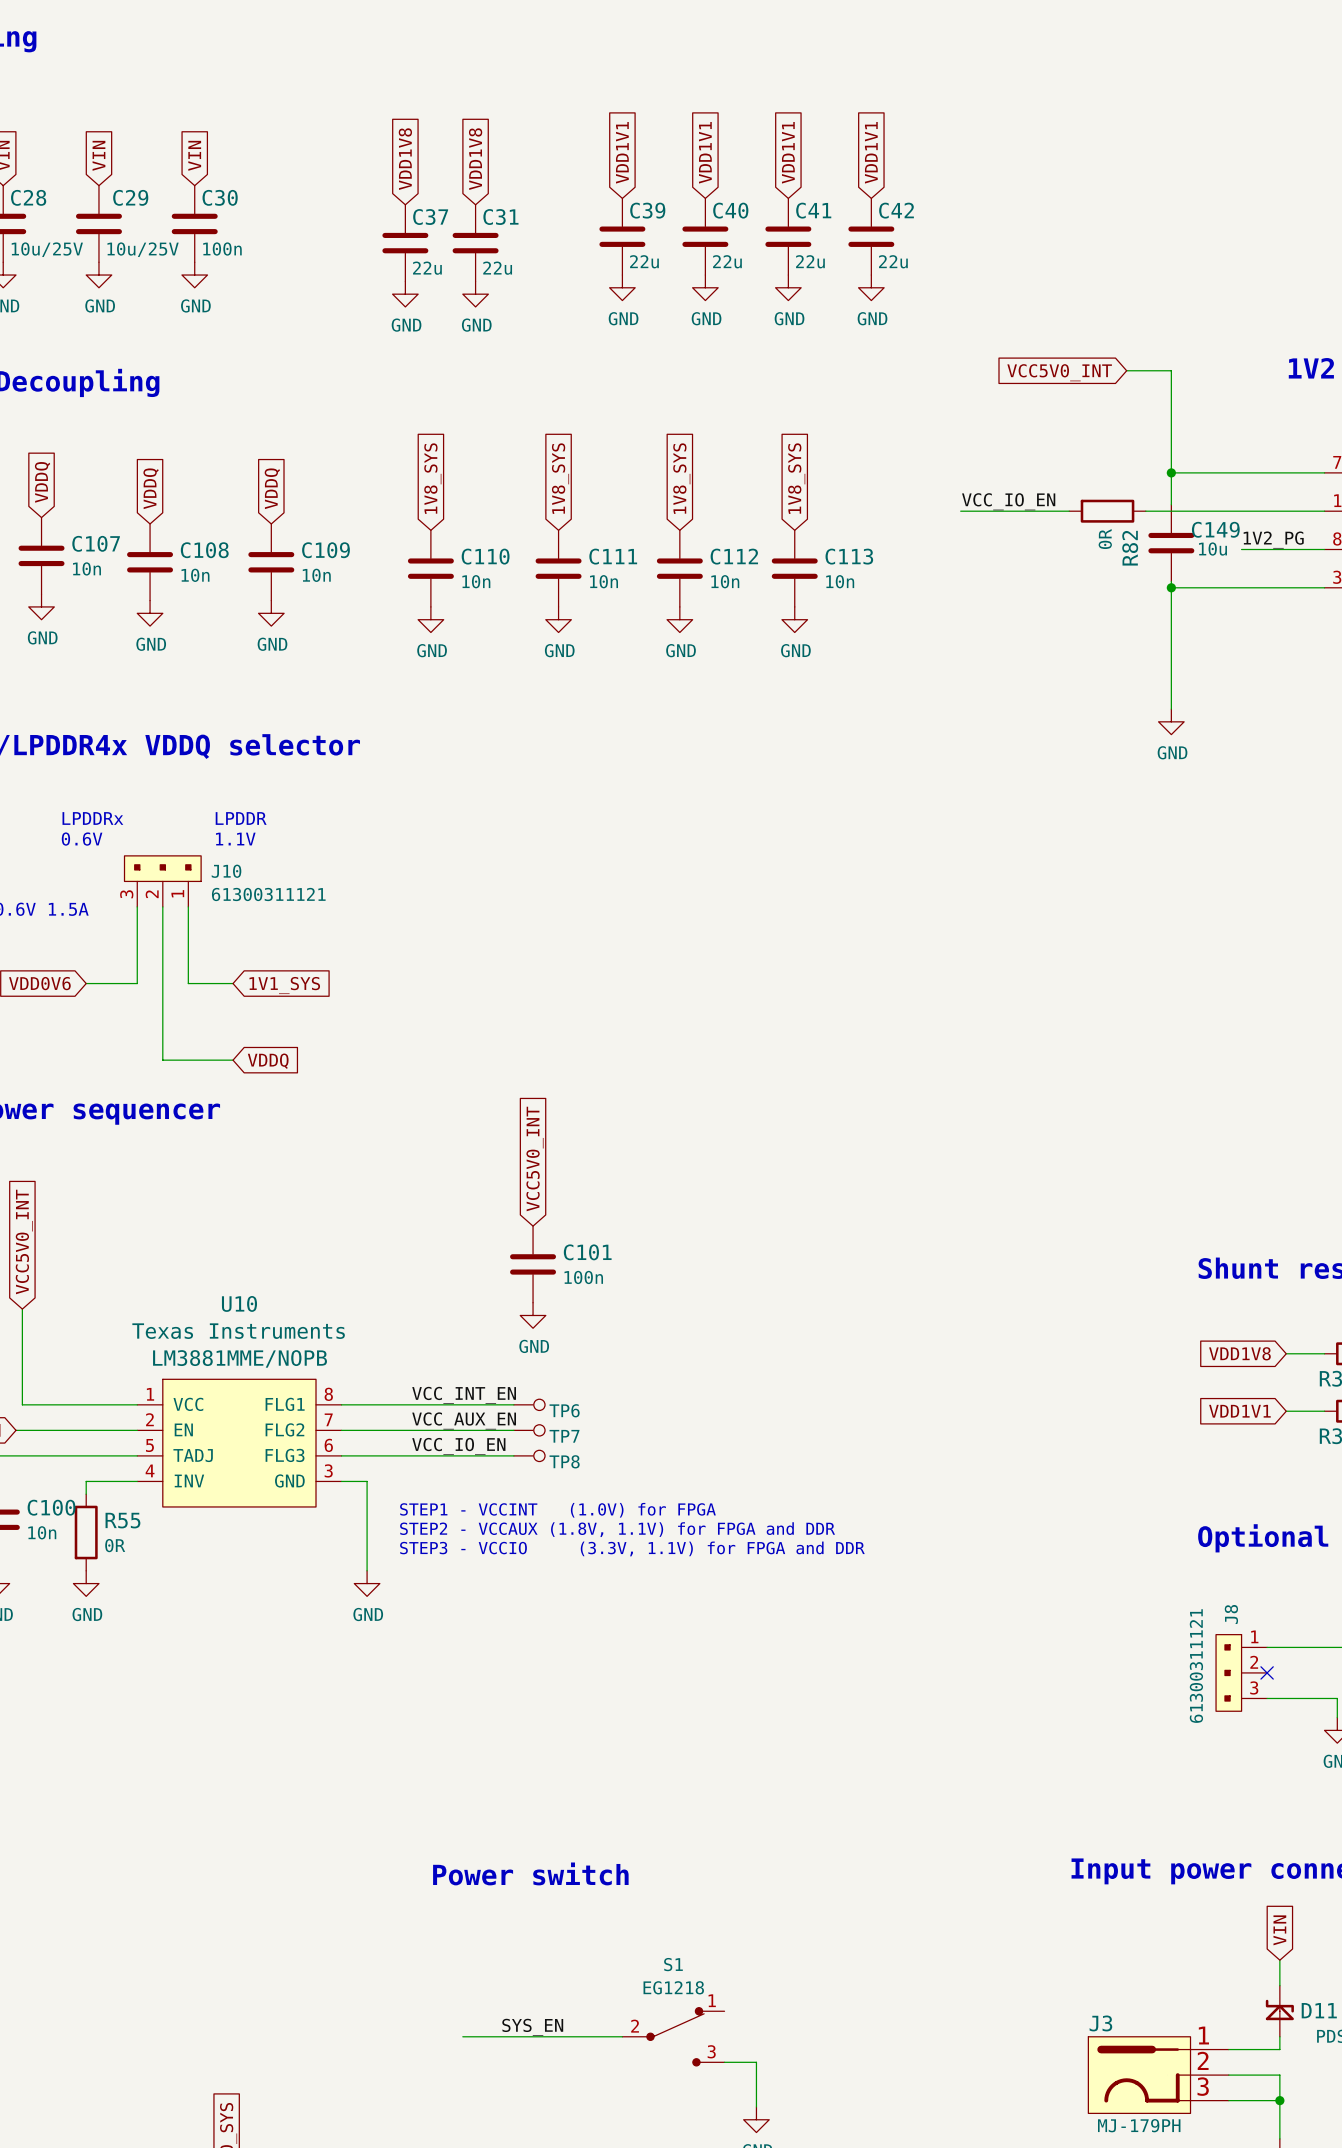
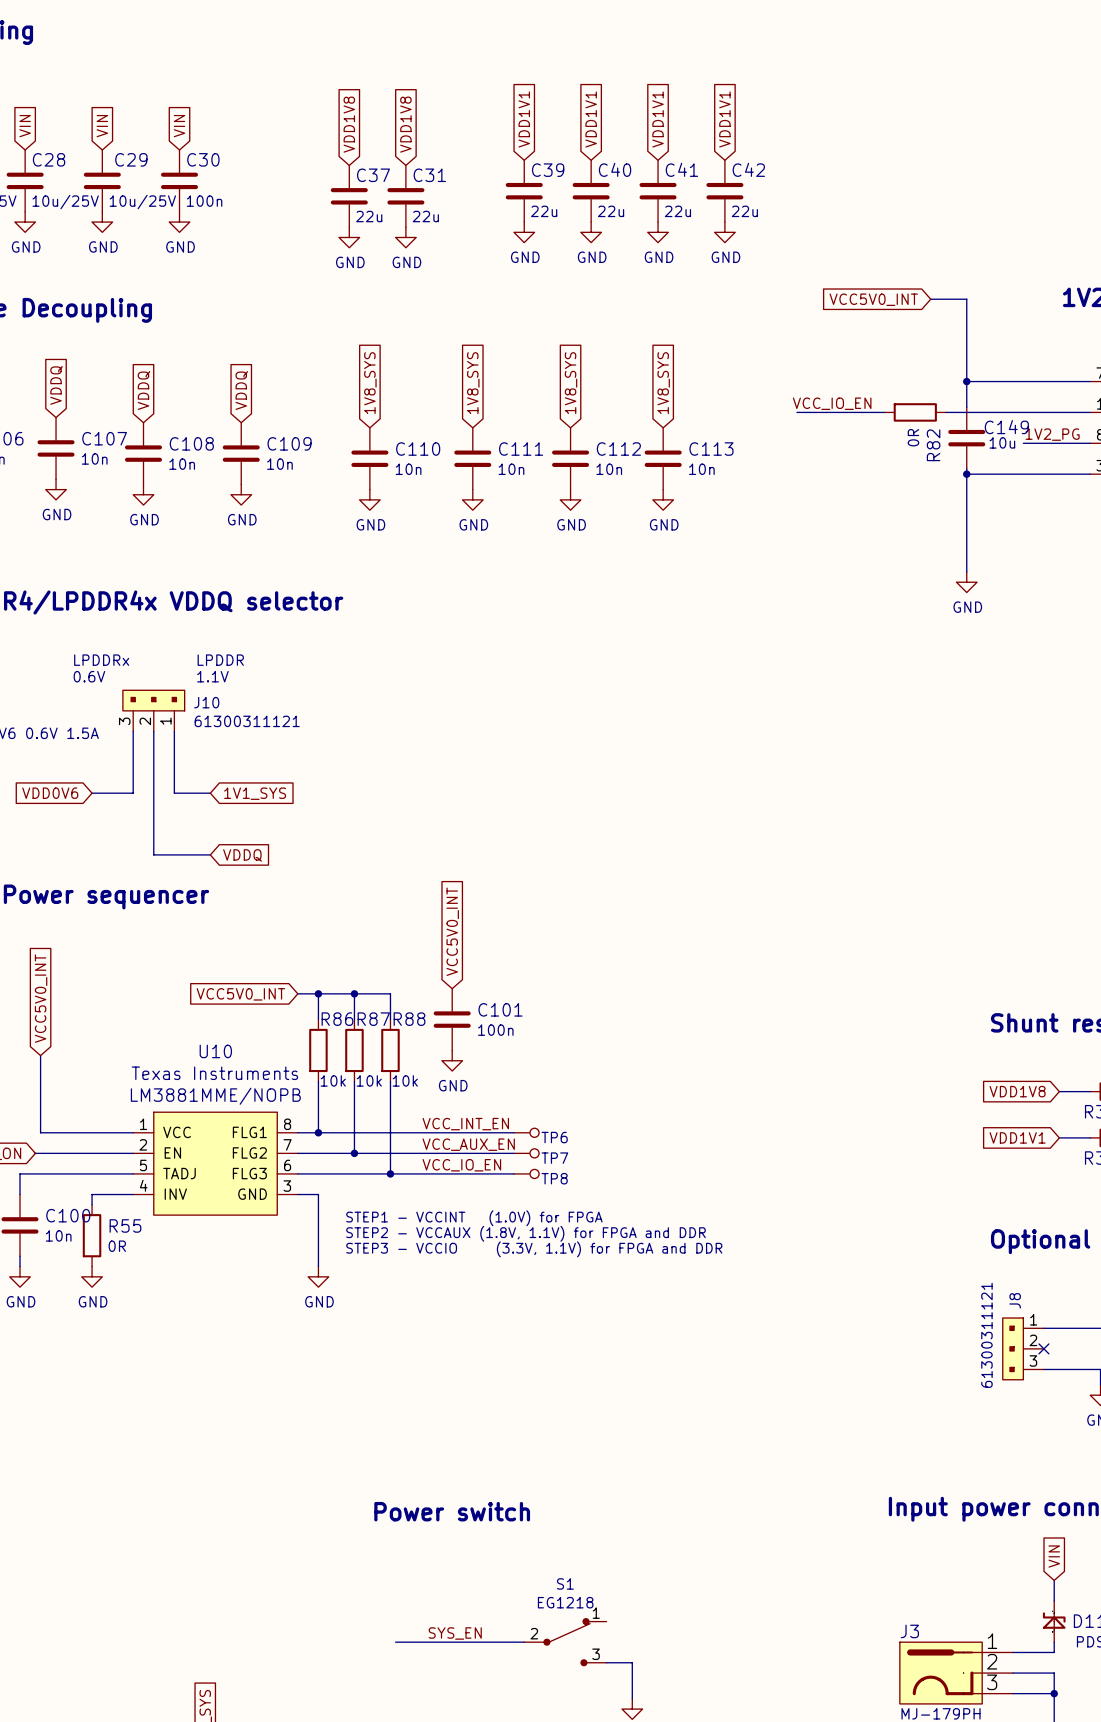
wire: none -> (297, 993) (390, 993) (390, 1019)
wire: none -> (318, 993) (318, 1019)
junction: none -> (318, 993)
wire: none -> (354, 993) (354, 1019)
junction: none -> (354, 993)
global label: none -> VCC5V0_INT (240, 994)
R86: none -> (318, 1050)
R87: none -> (354, 1050)
R88: none -> (390, 1050)
wire: none -> (318, 1081) (318, 1132)
wire: none -> (354, 1081) (354, 1153)
wire: none -> (390, 1081) (390, 1173)
label position: VCC_INT_EN (464, 1395) -> VCC_INT_EN (465, 1124)
junction: none -> (318, 1132)
wire: none -> (436, 1132) (513, 1132)
TP6 position: (529, 1404) -> (526, 1132)
label position: VCC_AUX_EN (464, 1420) -> VCC_AUX_EN (468, 1144)
junction: none -> (354, 1153)
wire: none -> (436, 1153) (513, 1153)
TP7 position: (529, 1430) -> (526, 1153)
label position: VCC_IO_EN (458, 1446) -> VCC_IO_EN (461, 1165)
junction: none -> (390, 1173)
wire: none -> (436, 1173) (513, 1173)
TP8 position: (529, 1455) -> (526, 1173)

